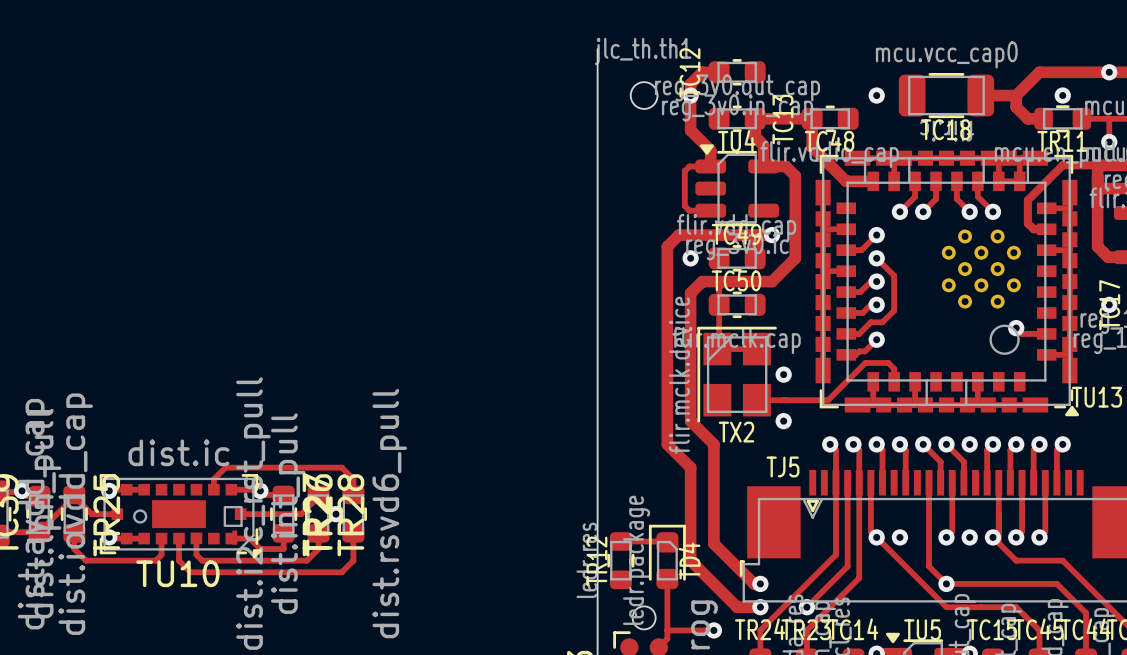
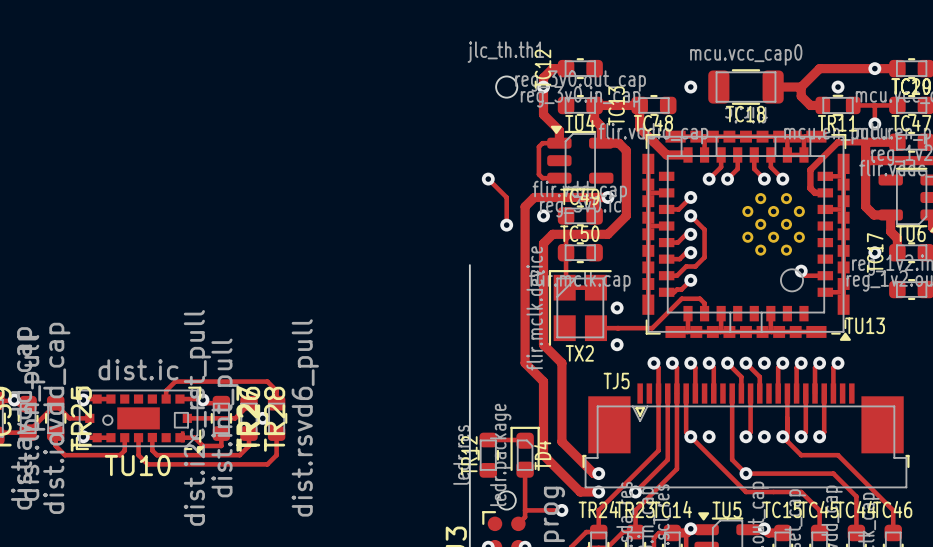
board edge: (597, 49) (597, 320) -> none
track: none -> (488, 179) (506, 197) (506, 225)
via: none -> (488, 179)
via: none -> (506, 225)

